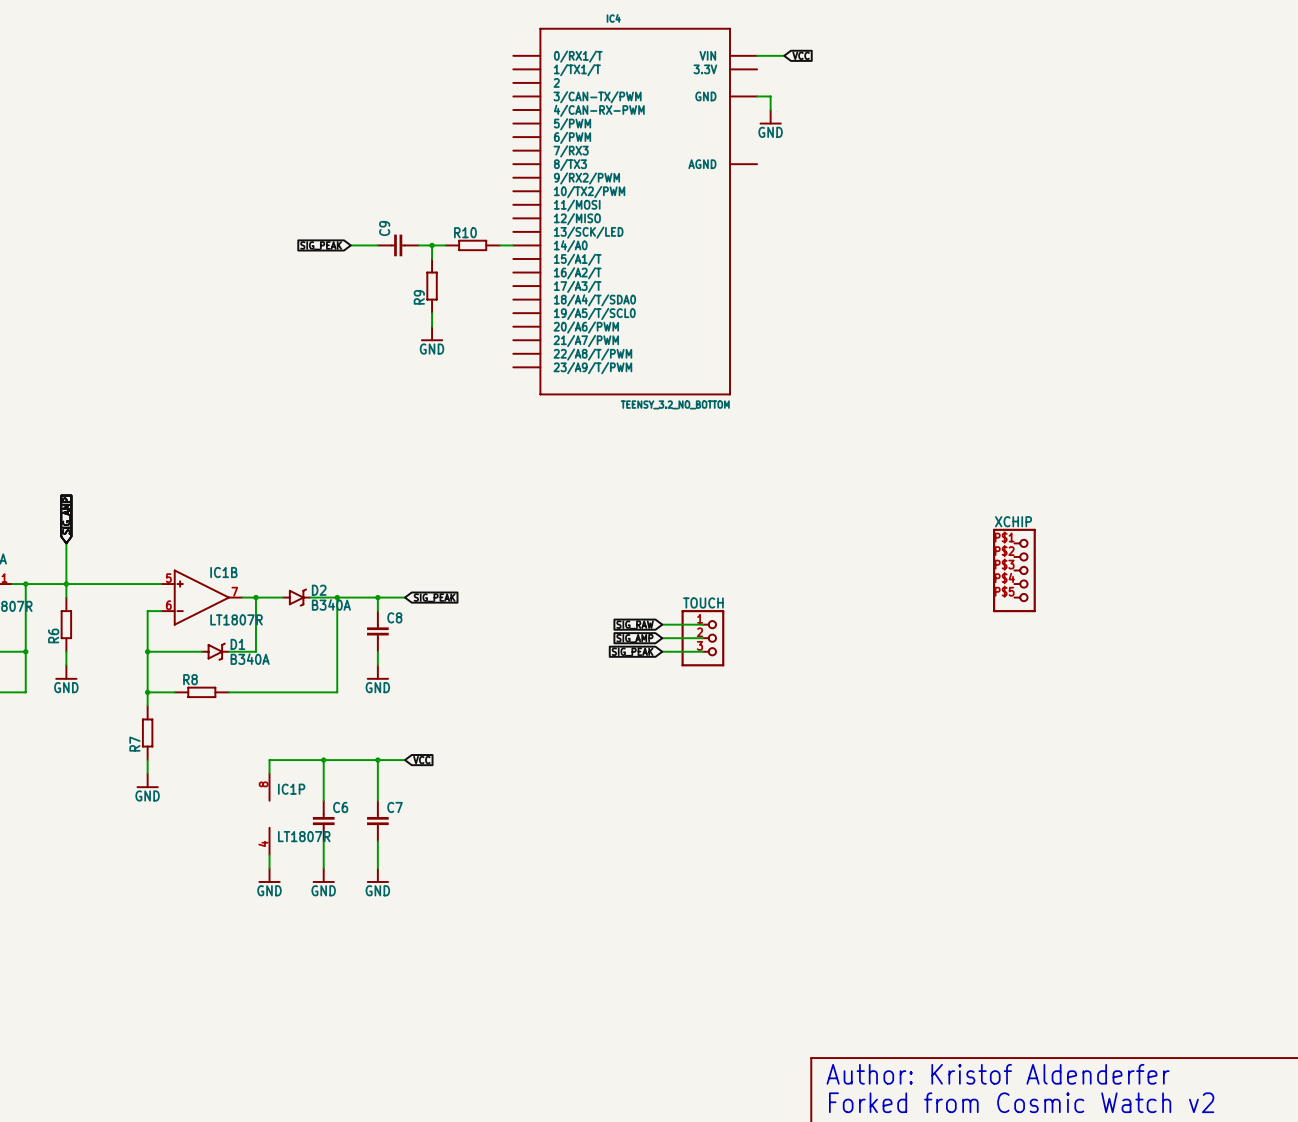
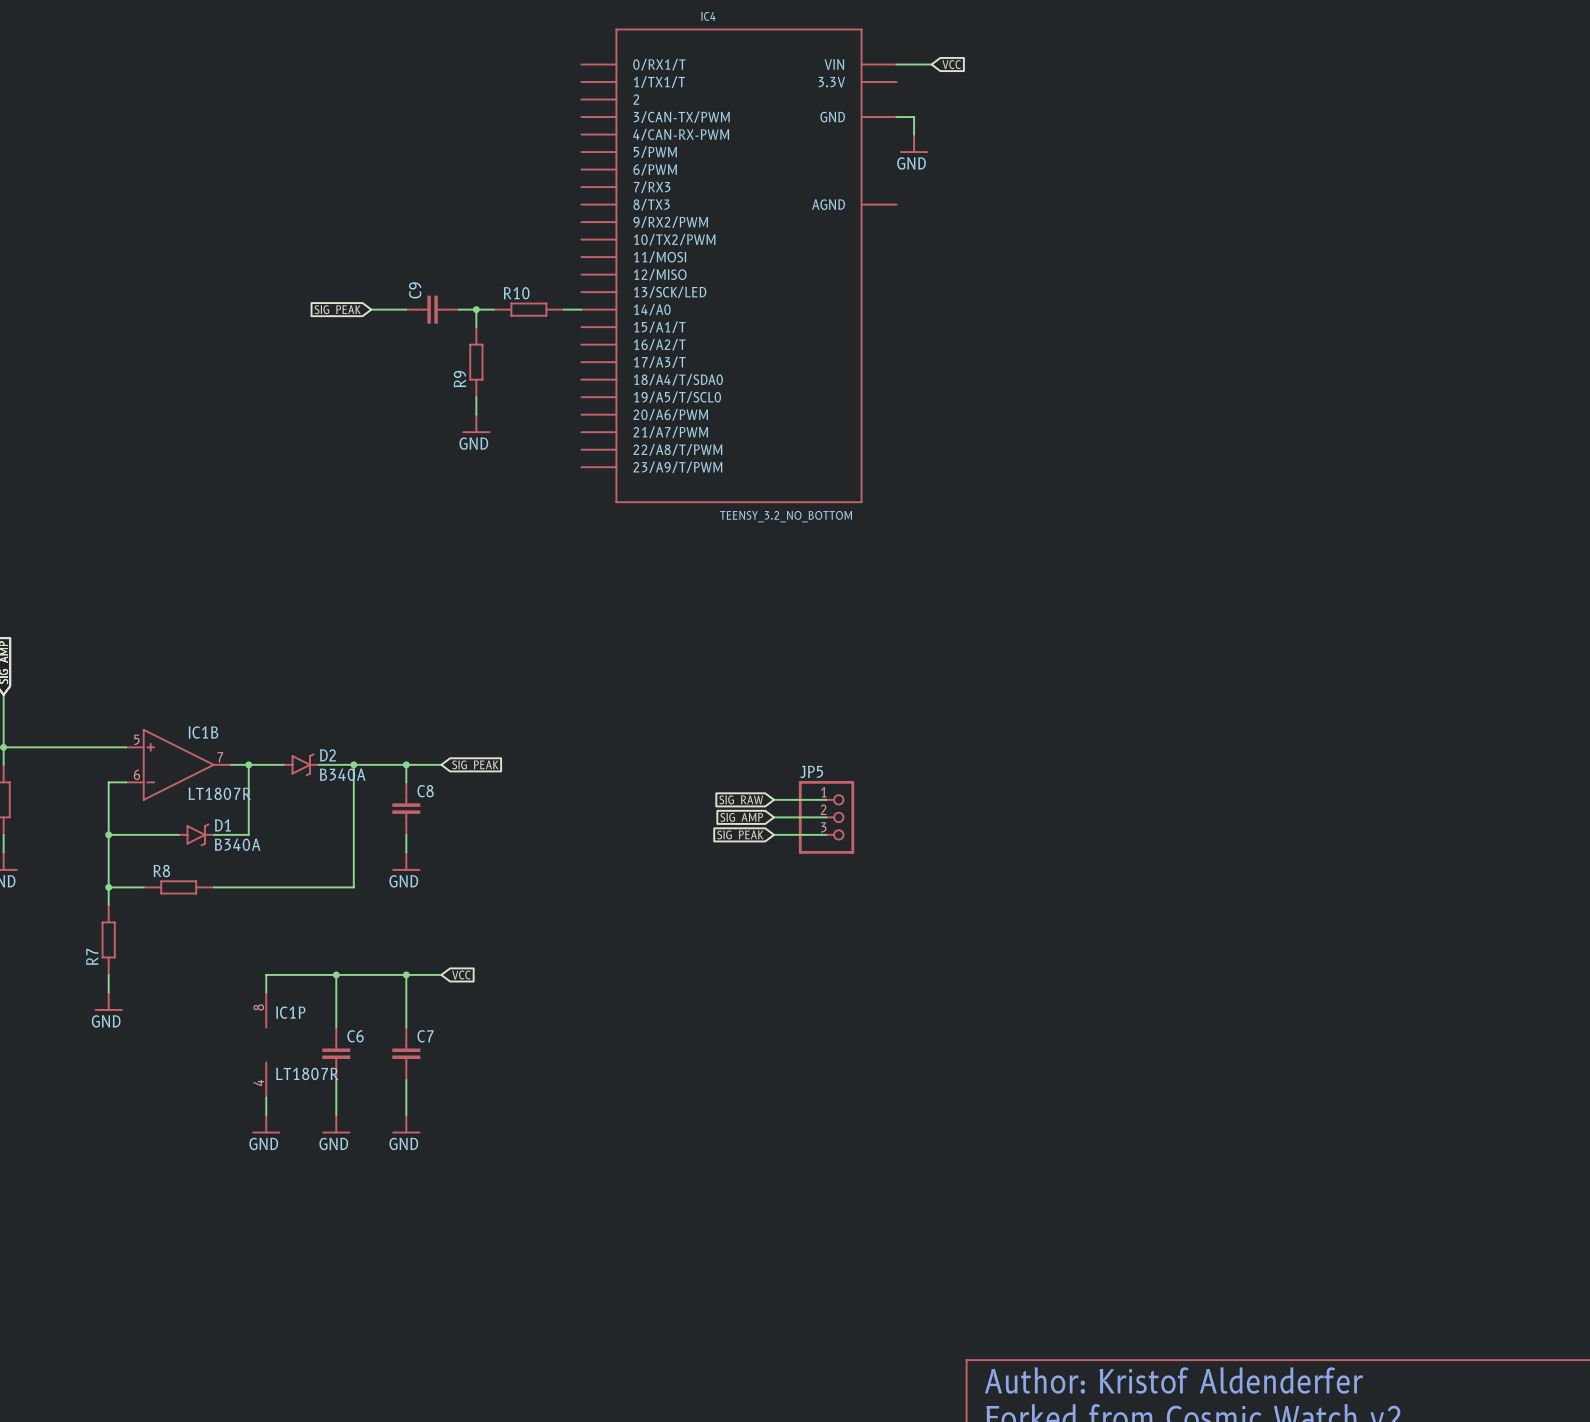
XCHIP: (1014, 570) -> none
TOUCH name: TOUCH (703, 602) -> JP5 (811, 771)

